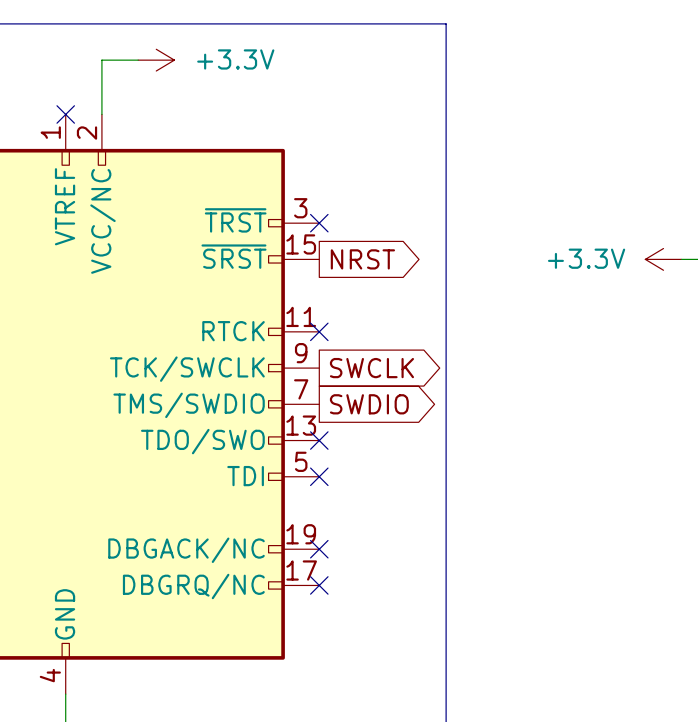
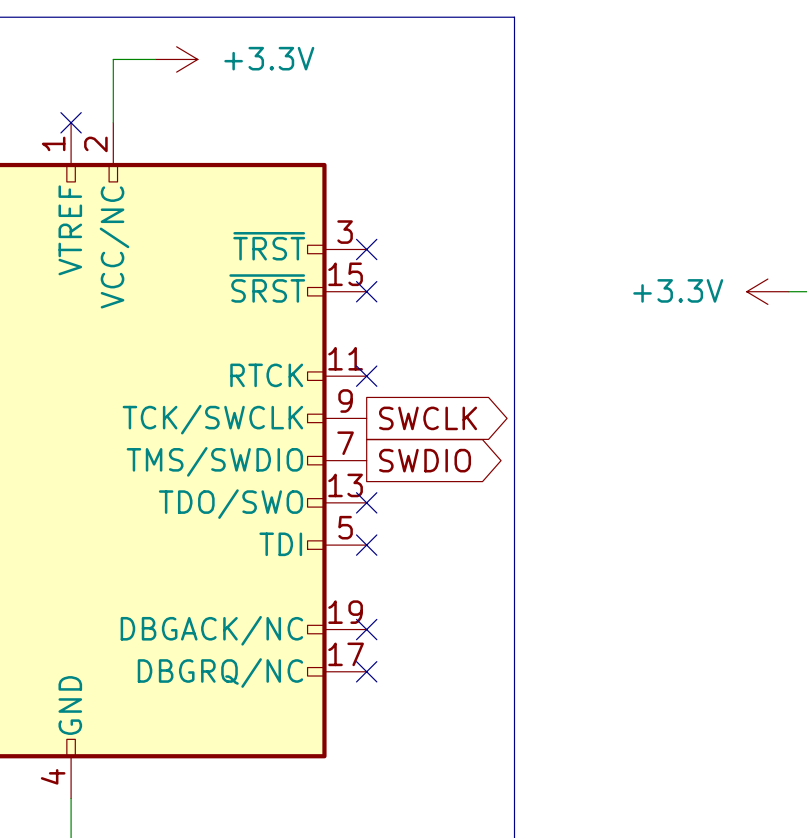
no-connect mark: none -> (366, 291)
global label: NRST (362, 259) -> none

